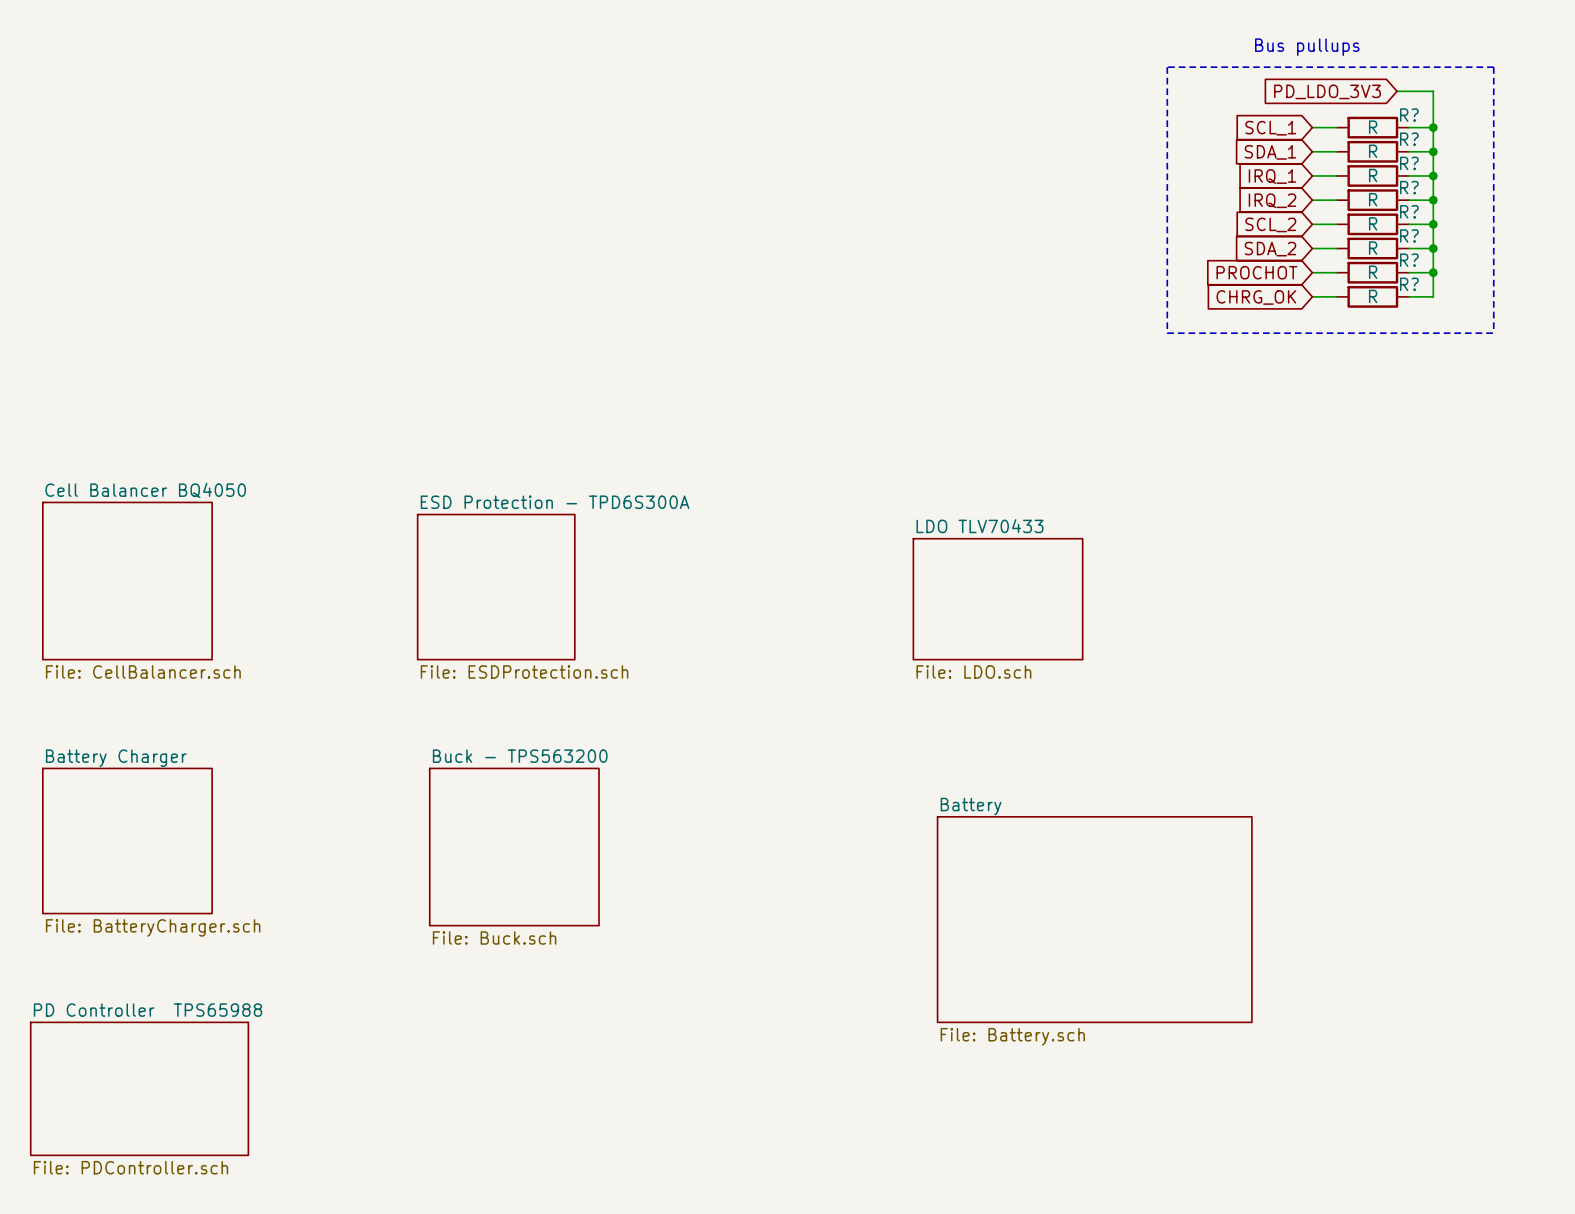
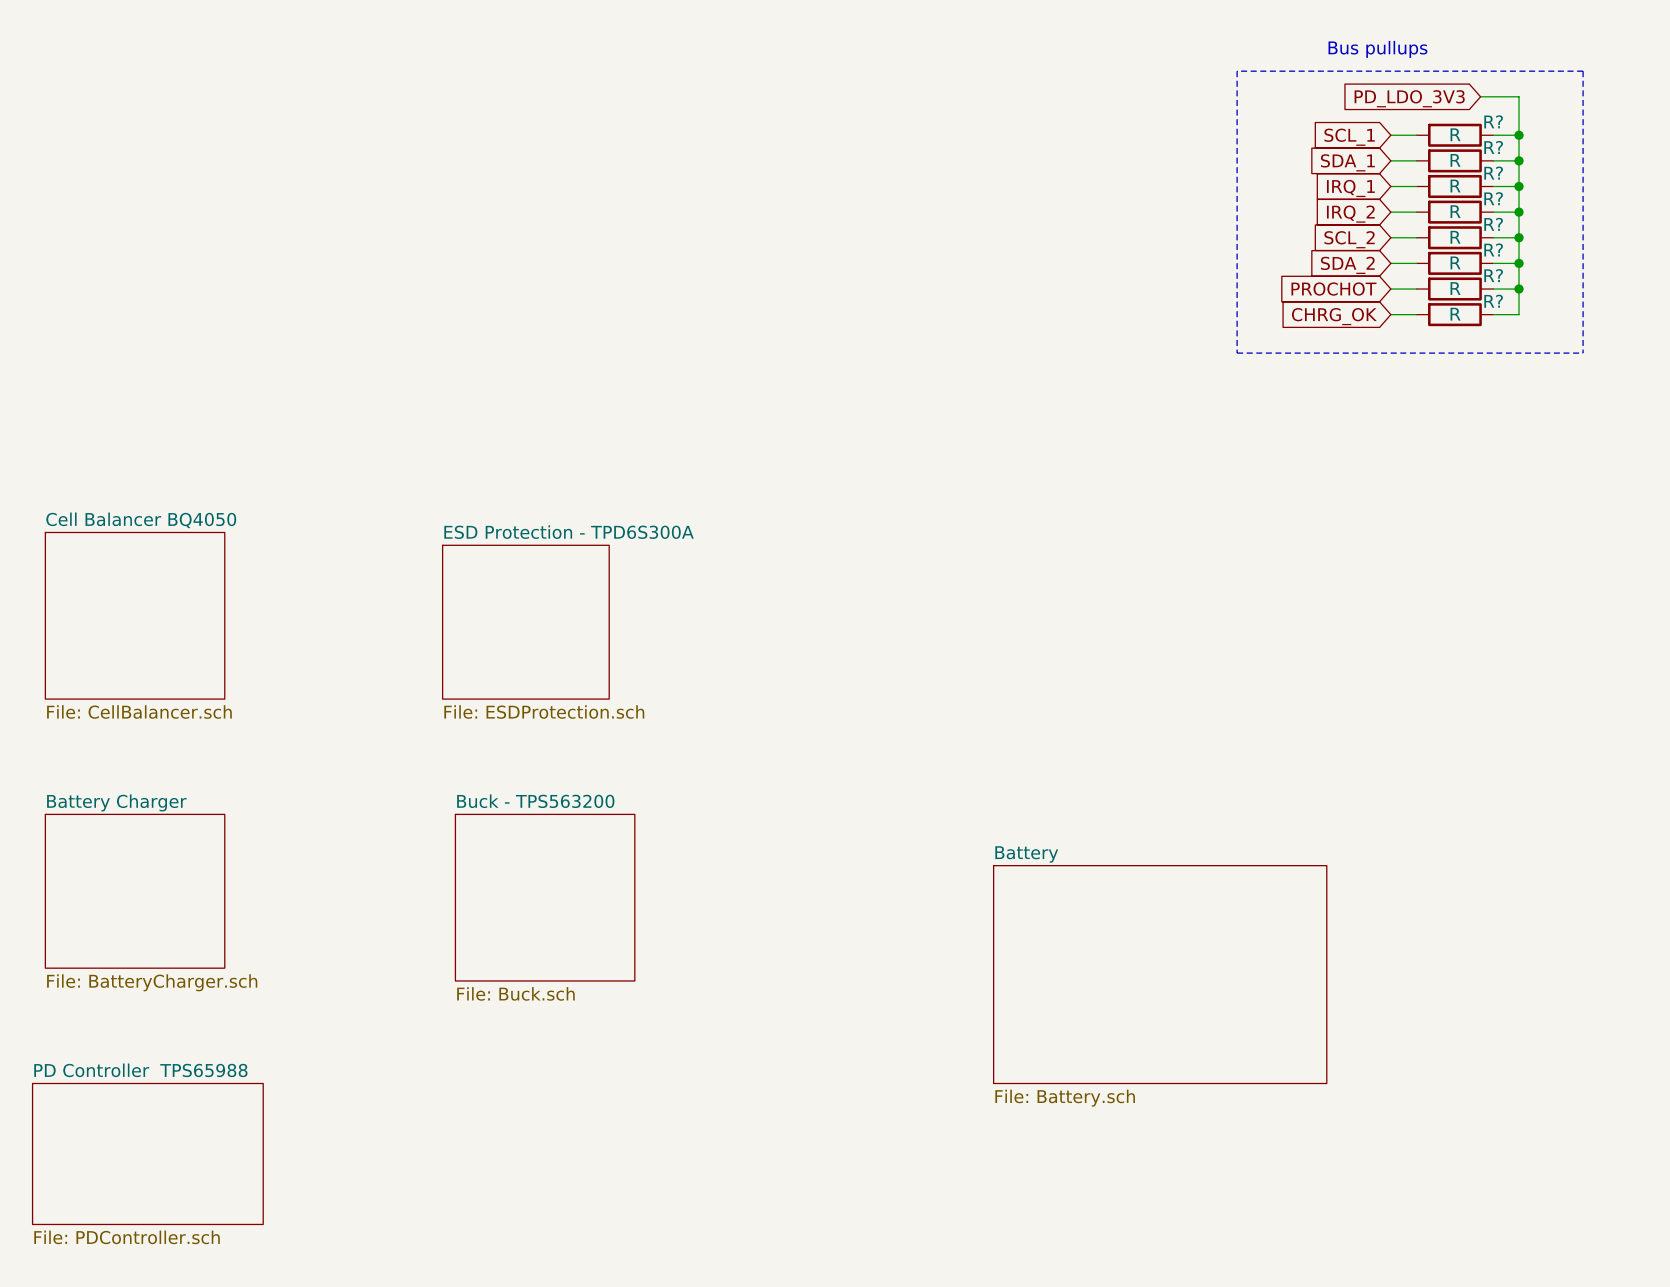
sheet LDO TLV70433: File: LDO.sch (998, 599) -> none

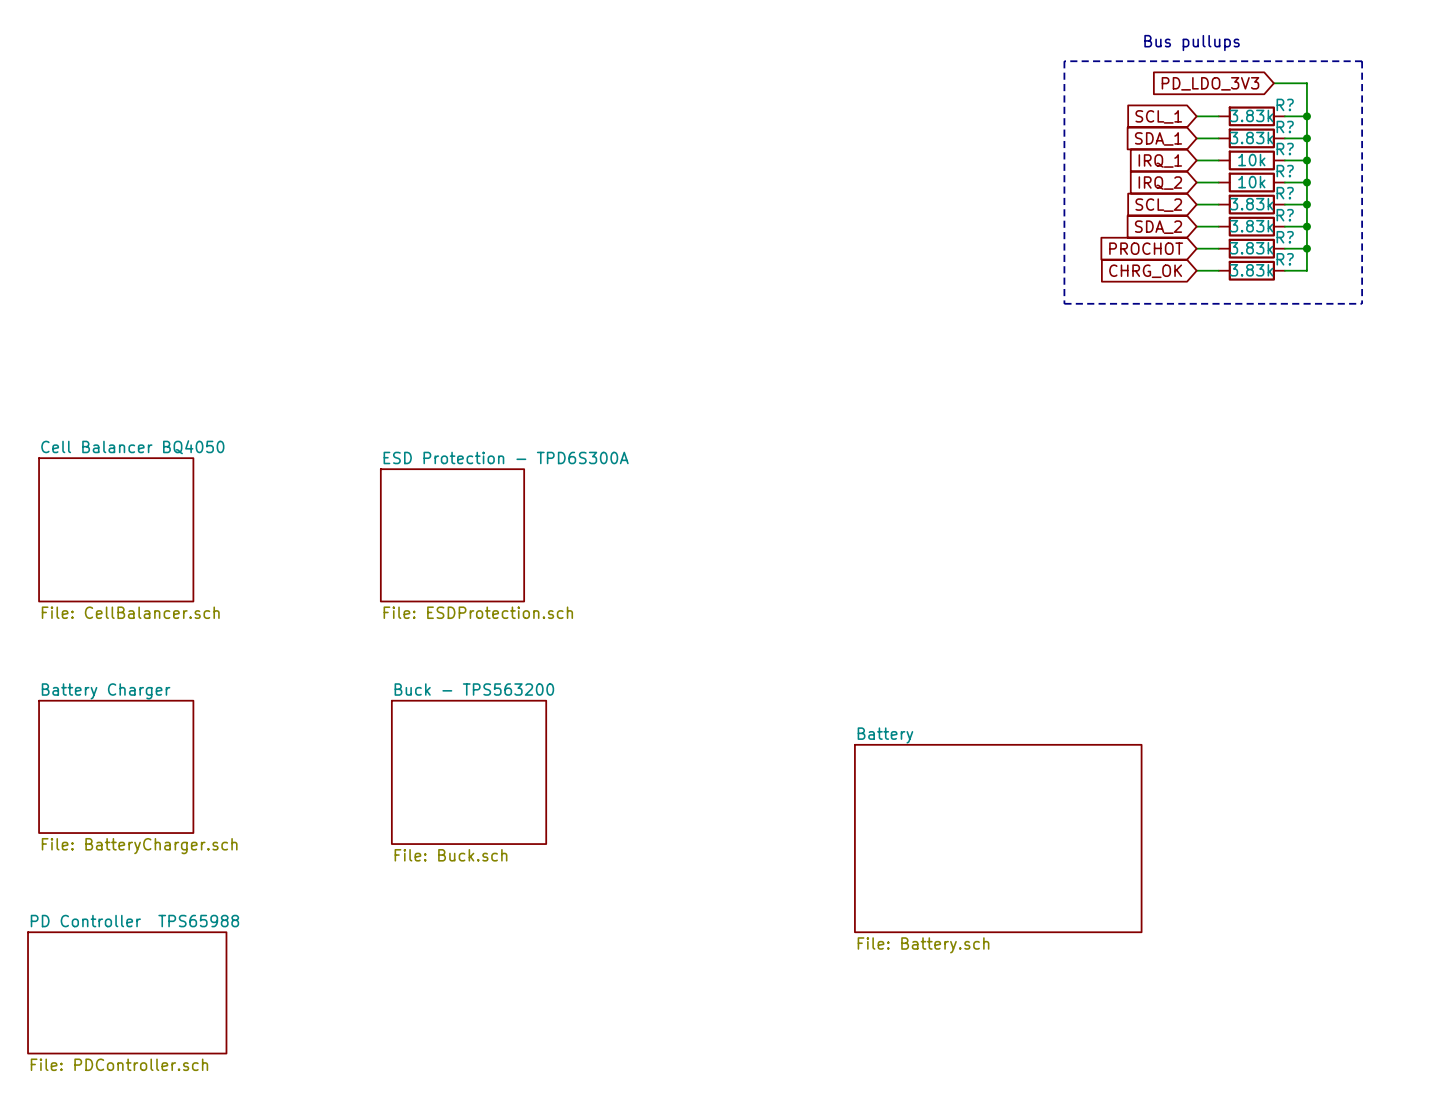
R? value: R (1455, 134) -> 3.83k (1251, 115)
R? value: R (1455, 160) -> 3.83k (1251, 138)
R? value: R (1455, 186) -> 10k (1251, 160)
R? value: R (1455, 211) -> 10k (1251, 182)
R? value: R (1455, 237) -> 3.83k (1251, 204)
R? value: R (1455, 262) -> 3.83k (1251, 226)
R? value: R (1455, 288) -> 3.83k (1251, 248)
R? value: R (1455, 314) -> 3.83k (1251, 270)

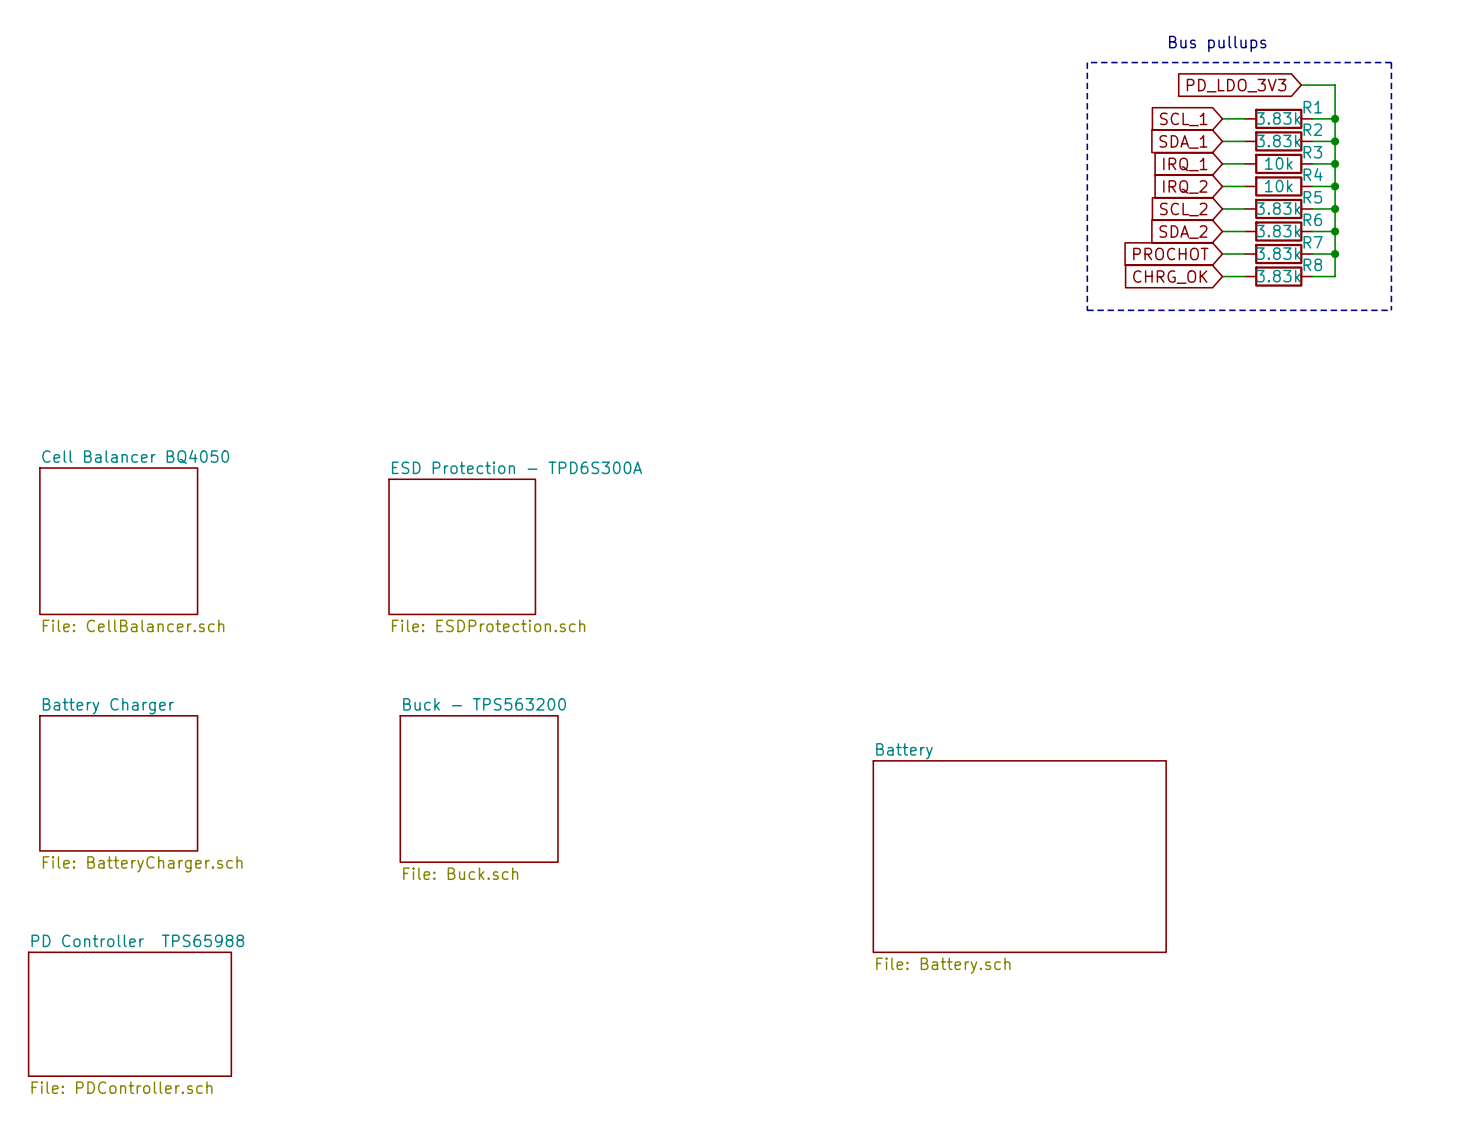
R? name: R? (1285, 104) -> R1 (1312, 107)
R? name: R? (1285, 126) -> R2 (1312, 129)
R? name: R? (1285, 149) -> R3 (1312, 152)
R? name: R? (1285, 171) -> R4 (1313, 174)
R? name: R? (1285, 193) -> R5 (1312, 197)
R? name: R? (1285, 215) -> R6 (1312, 219)
R? name: R? (1285, 237) -> R7 (1313, 242)
R? name: R? (1285, 259) -> R8 (1312, 264)

